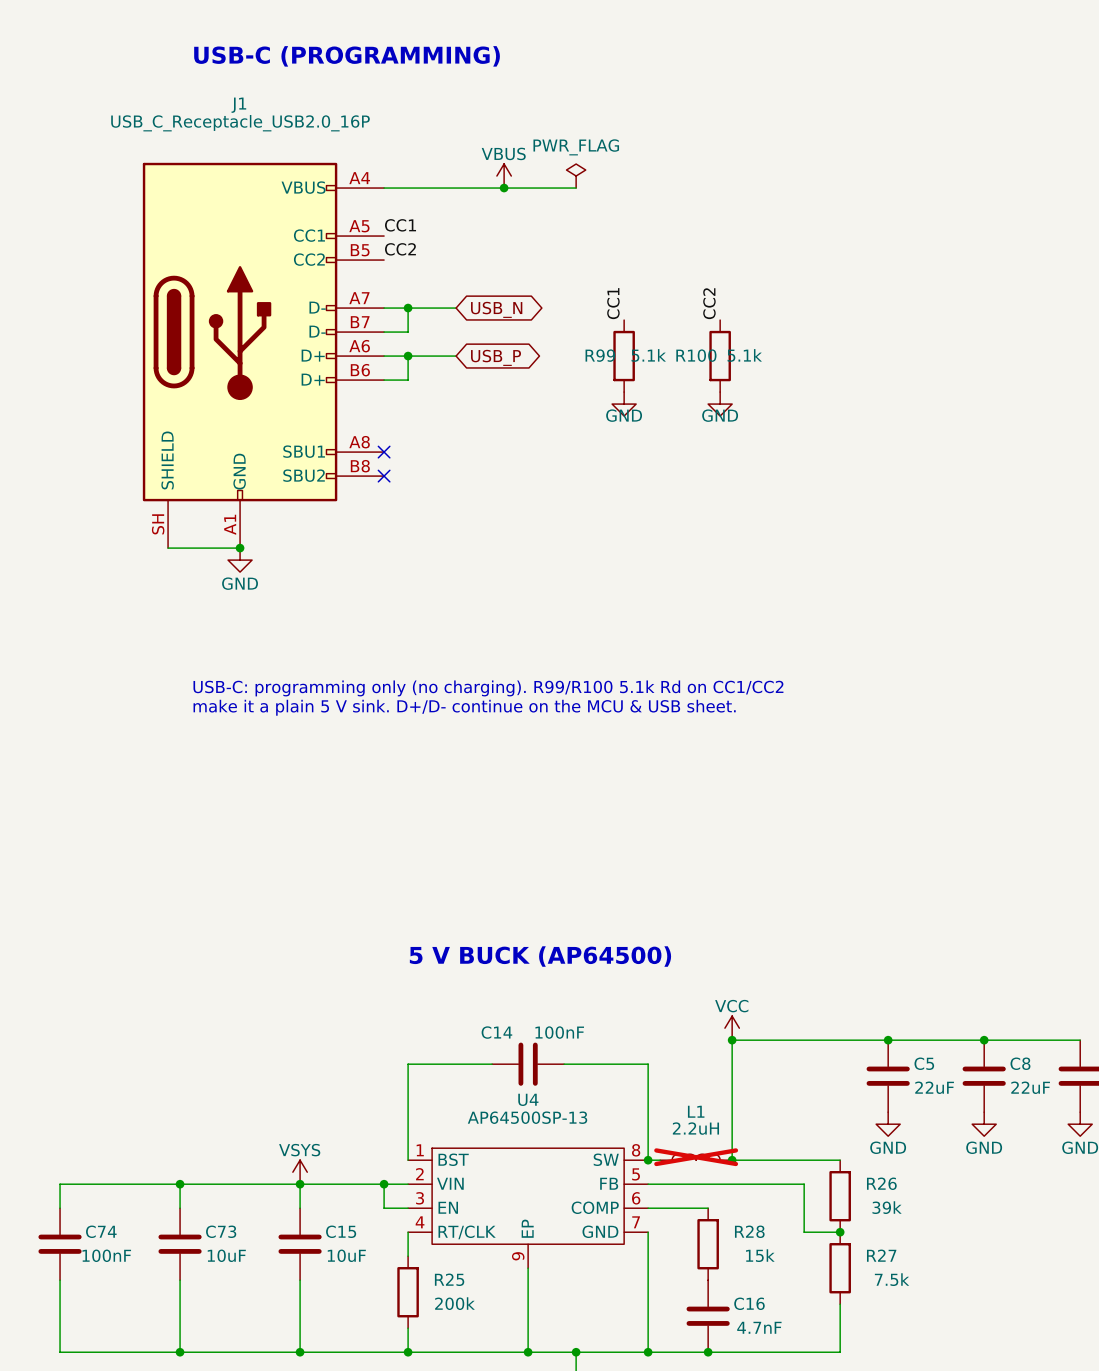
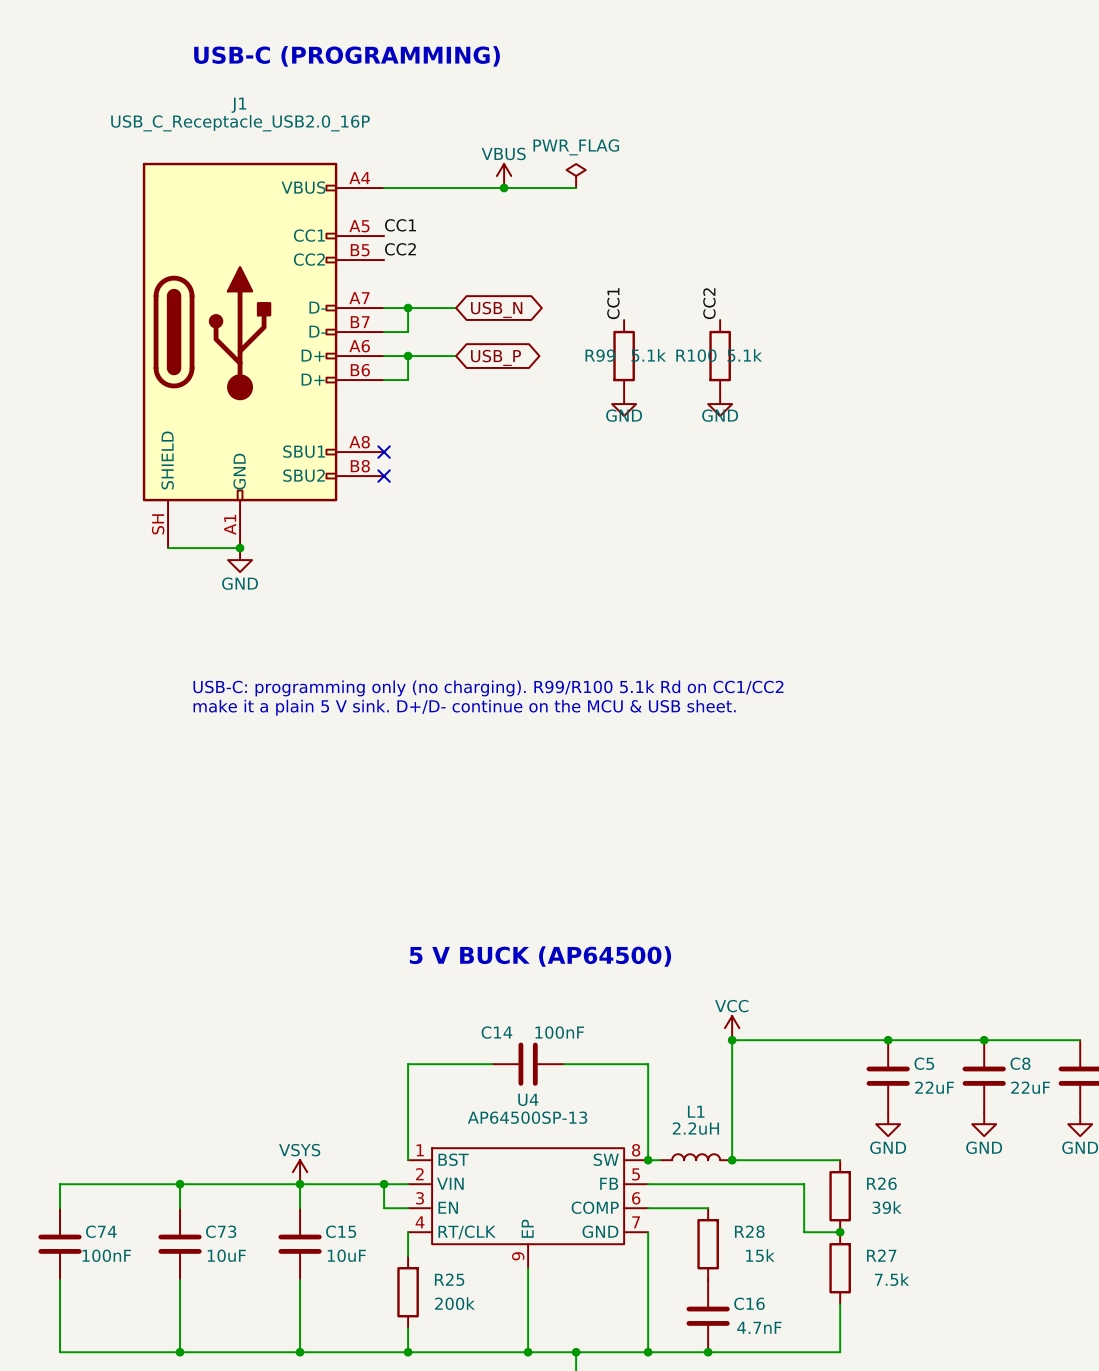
L1 do-not-place cross: (696, 1157) -> none

